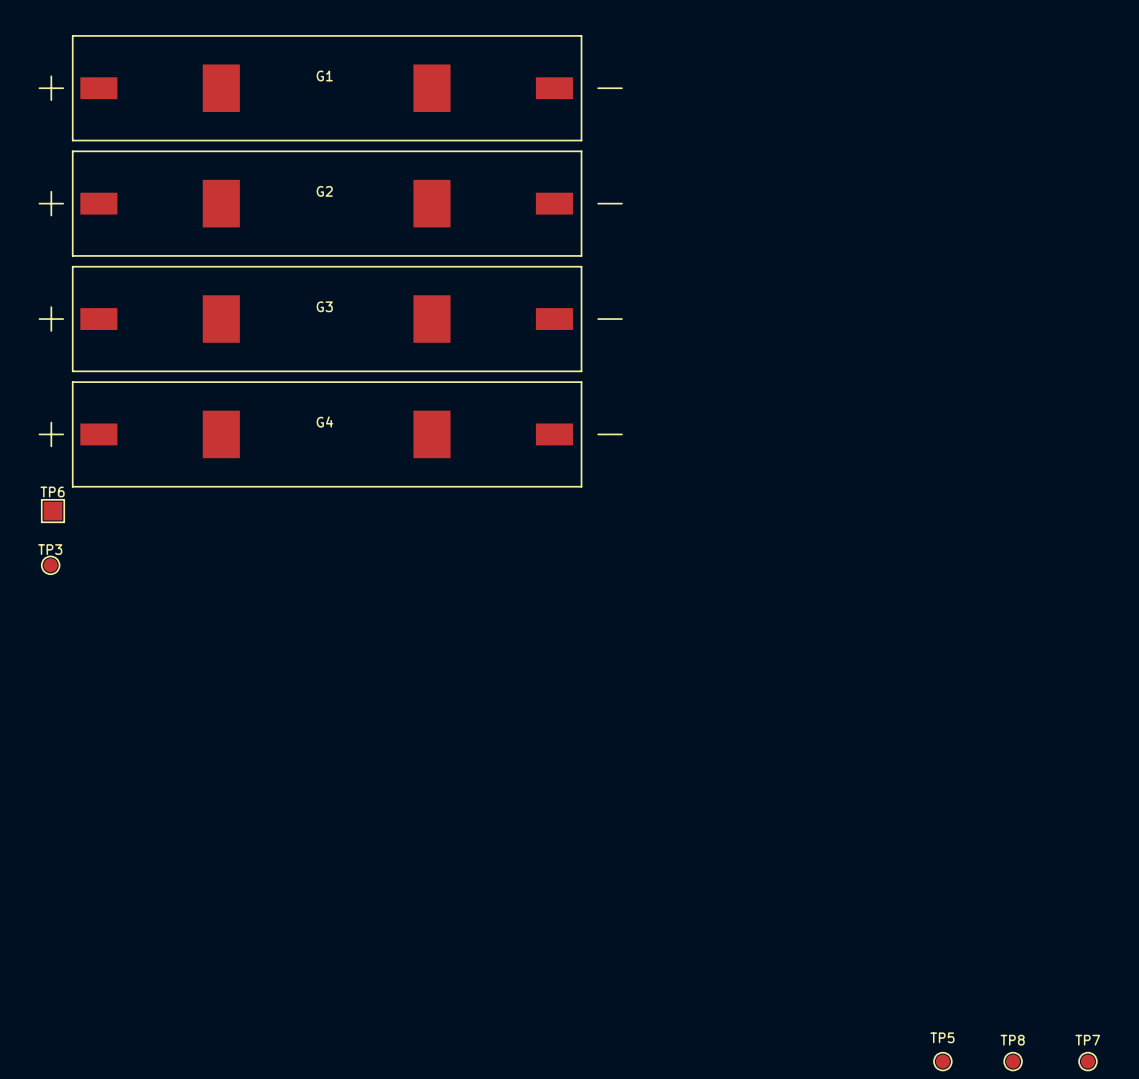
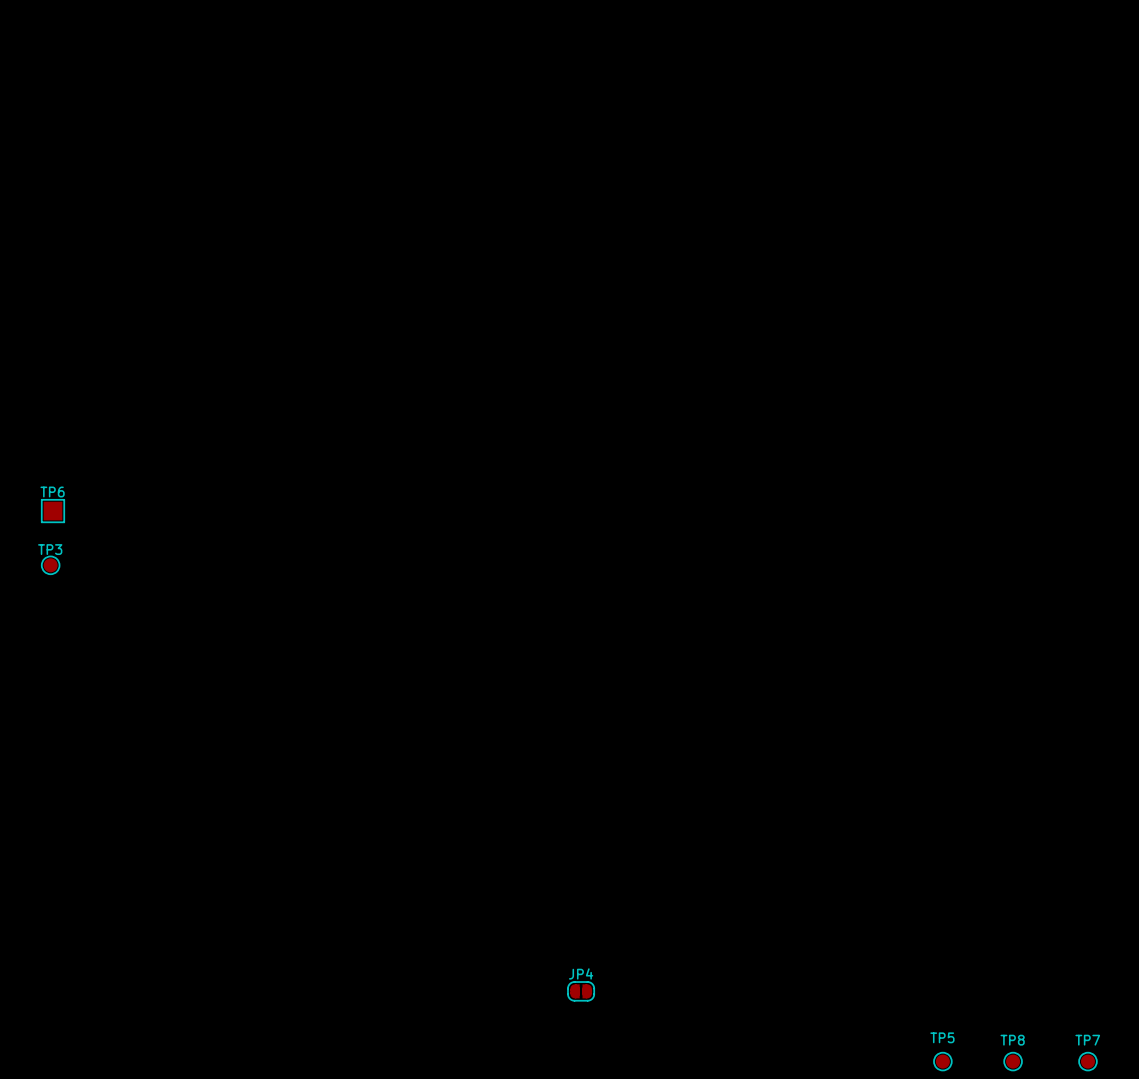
G1: (330, 88) -> none
G2: (330, 203) -> none
G3: (330, 319) -> none
G4: (330, 434) -> none
JP4: none -> (581, 991)

